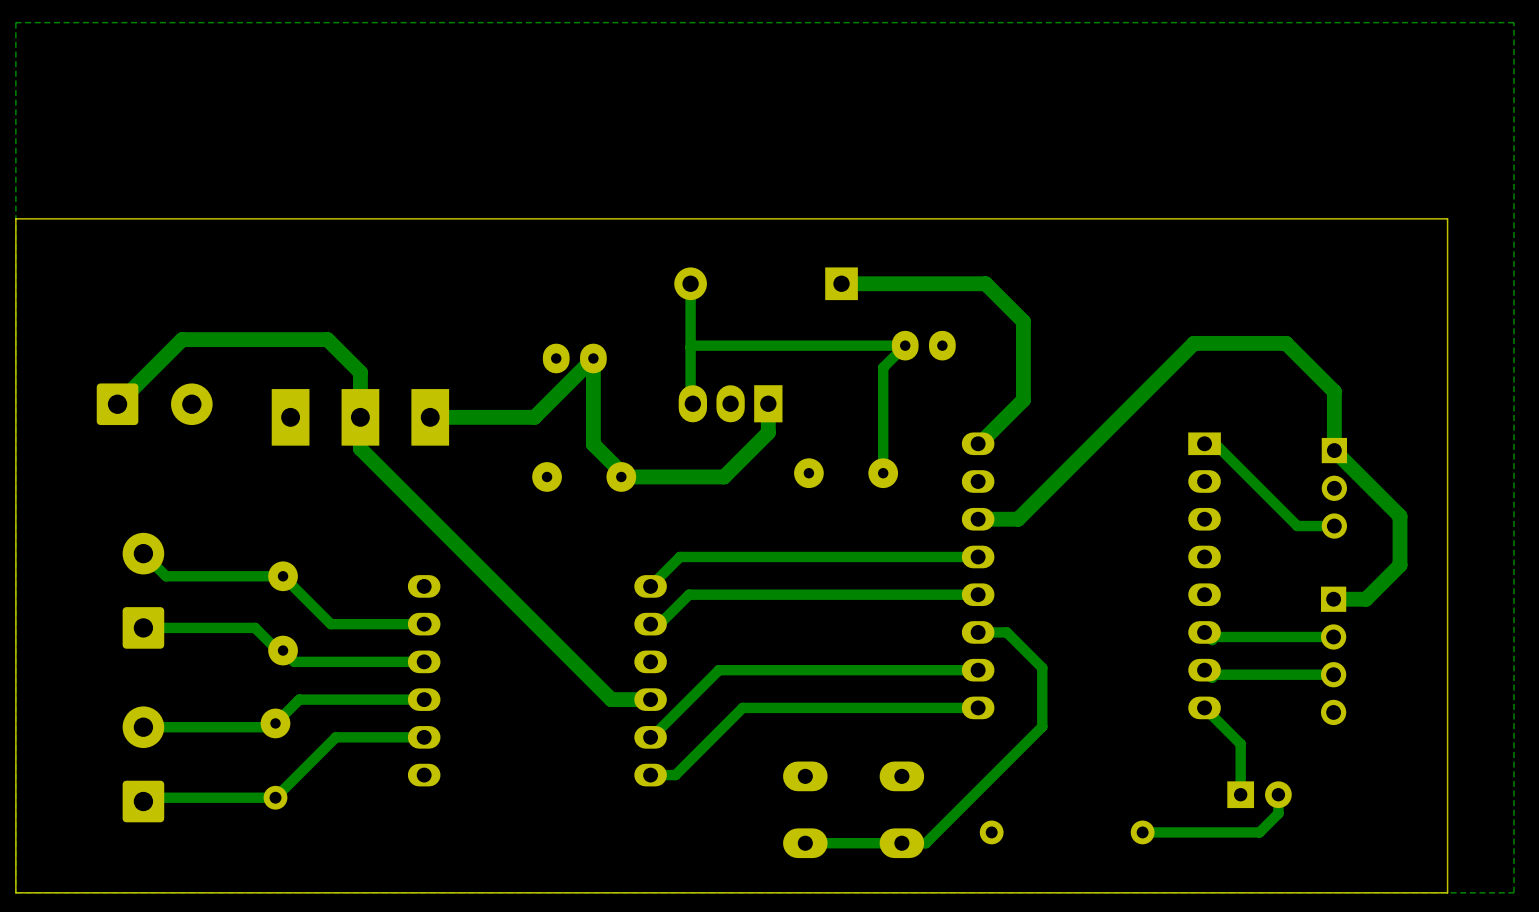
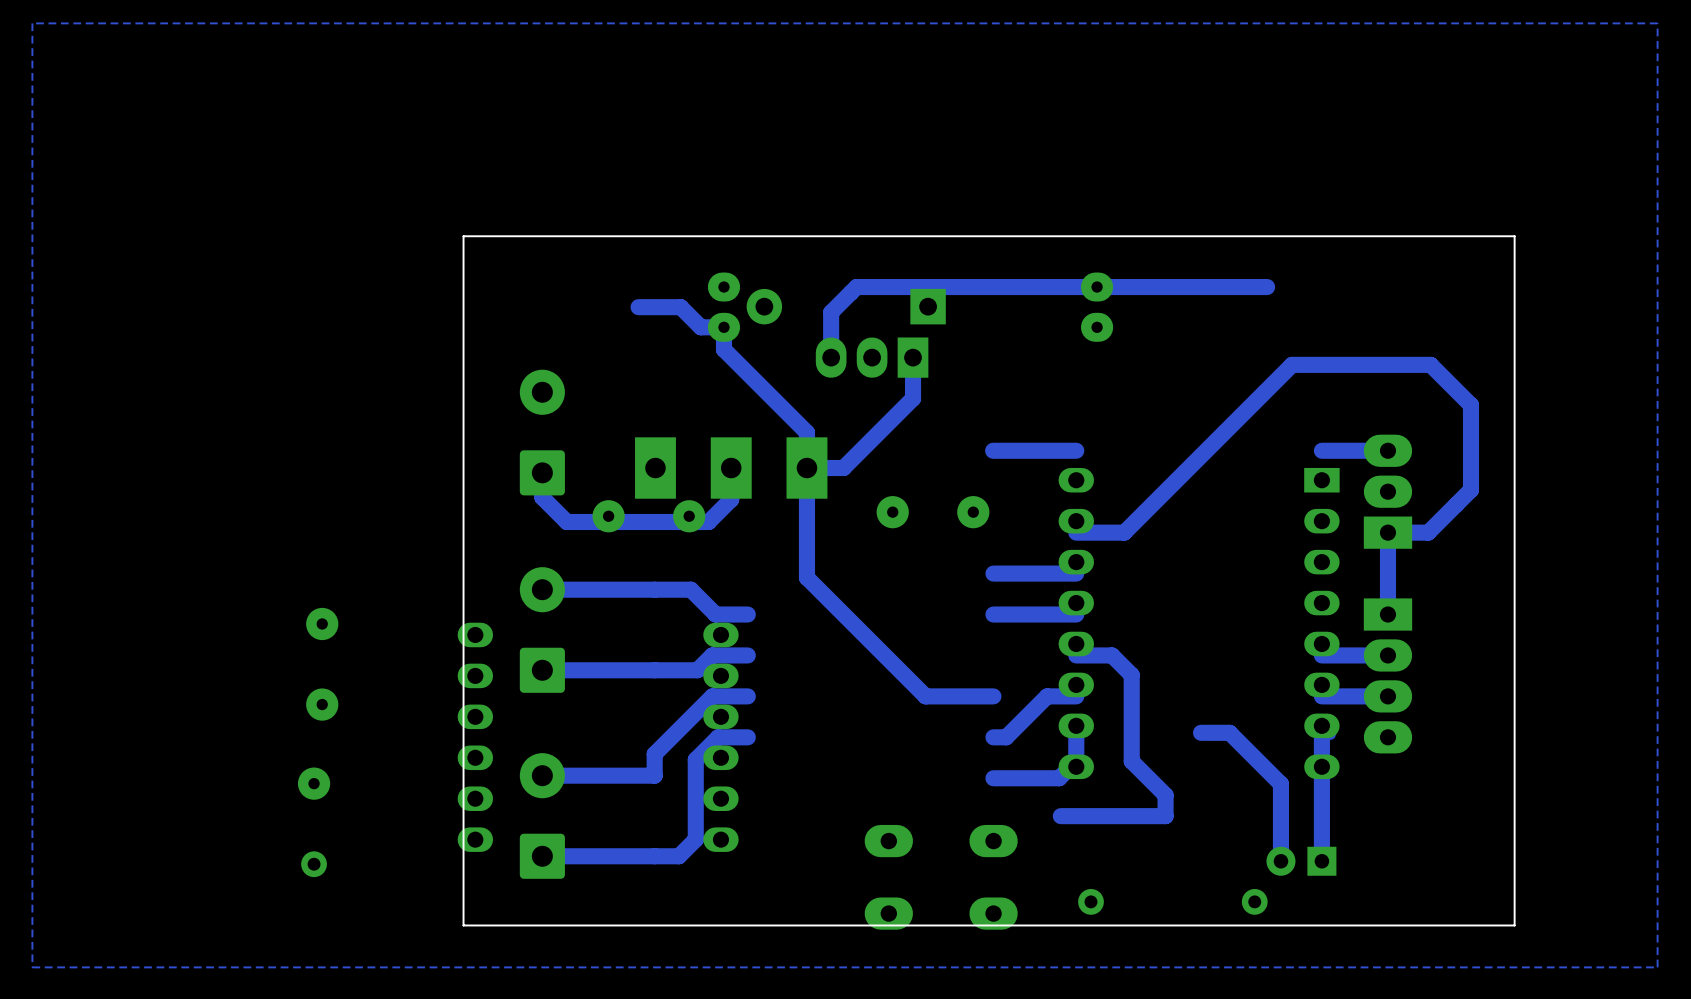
board edge: (1382, 218) (1447, 218) (1447, 892) (15, 892) (15, 218) (413, 218) -> (1514, 236) (1514, 925) (463, 925) (463, 236)
bottom track: none -> (1267, 287) (856, 287) (831, 312) (831, 357)
bottom track: (690, 283) (690, 401) (692, 403) -> none
bottom track: (841, 283) (985, 283) (1023, 321) (1023, 399) (978, 443) -> none
bottom track: none -> (638, 307) (680, 307) (700, 327) (723, 327) (723, 349) (806, 432) (806, 577) (925, 696) (993, 696)
bottom track: none -> (913, 357) (913, 398) (843, 468) (806, 468)
part rotation: 0° (923, 345) -> 90° clockwise (1097, 307)
part position: (923, 345) -> (1097, 307)
bottom track: (690, 347) (905, 345) (883, 367) (883, 473) -> none
part rotation: 0° (574, 358) -> 90° clockwise (723, 307)
part position: (574, 358) -> (723, 307)
part: none -> (542, 432)
part position: (730, 403) -> (872, 357)
bottom track: (768, 403) (768, 432) (724, 476) (621, 476) (621, 472) (593, 444) (593, 358) (534, 417) (430, 417) -> none
bottom track: (117, 404) (182, 339) (327, 339) (360, 372) (360, 448) (611, 699) (650, 699) -> none
part: (154, 404) -> none
bottom track: none -> (1076, 450) (993, 450)
bottom track: none -> (1387, 450) (1321, 450)
part position: (360, 417) -> (731, 468)
bottom track: none -> (731, 468) (731, 499) (708, 522) (566, 522) (542, 497) (542, 472)
bottom track: (1204, 443) (1215, 443) (1297, 526) (1334, 526) -> none
part: none -> (1387, 491)
part: (1334, 488) -> none
bottom track: none -> (1076, 532) (1124, 532) (1292, 364) (1430, 364) (1470, 405) (1470, 489) (1428, 532) (1387, 532) (1387, 614)
bottom track: (978, 519) (1018, 519) (1193, 343) (1286, 343) (1334, 391) (1334, 450) (1400, 516) (1400, 565) (1366, 599) (1333, 599) -> none
bottom track: none -> (1076, 573) (993, 573)
bottom track: none -> (542, 589) (690, 589) (715, 614) (747, 614)
bottom track: (143, 553) (166, 576) (283, 576) (330, 624) (424, 624) -> none
bottom track: (978, 556) (680, 556) (650, 586) -> none
bottom track: none -> (1076, 614) (993, 614)
part: none -> (542, 629)
part: (143, 590) -> none
bottom track: (978, 594) (689, 594) (659, 624) (650, 624) -> none
bottom track: none -> (747, 655) (712, 655) (697, 670) (542, 670)
bottom track: none -> (1076, 655) (1112, 655) (1131, 675) (1131, 761) (1165, 795) (1165, 816) (1060, 816)
bottom track: none -> (1387, 655) (1321, 655)
part: none -> (1387, 675)
bottom track: (143, 627) (255, 627) (277, 650) (283, 650) (294, 661) (424, 661) -> none
bottom track: (973, 628) (978, 632) (1006, 632) (1042, 667) (1042, 726) (925, 843) (805, 843) -> none
bottom track: (1333, 636) (1209, 636) -> none
bottom track: none -> (747, 696) (712, 696) (654, 754) (654, 775) (542, 775)
bottom track: none -> (1076, 696) (1047, 696) (1006, 737) (993, 737)
bottom track: none -> (1387, 696) (1321, 696)
part: (1333, 655) -> none
bottom track: (978, 670) (718, 670) (650, 737) -> none
bottom track: (1333, 674) (1209, 674) -> none
bottom track: none -> (1201, 732) (1229, 732) (1280, 784) (1280, 861)
bottom track: none -> (747, 737) (718, 737) (695, 759) (695, 839) (679, 856) (542, 856)
bottom track: none -> (1076, 737) (1076, 761) (1059, 778) (993, 778)
bottom track: none -> (1321, 737) (1321, 861)
bottom track: (424, 699) (299, 699) (275, 723) (269, 723) (266, 727) (143, 727) (147, 723) -> none
bottom track: (978, 707) (742, 707) (675, 775) (650, 775) -> none
bottom track: (1196, 707) (1204, 707) (1240, 744) (1240, 794) -> none
bottom track: (424, 737) (335, 737) (271, 801) -> none
part: none -> (542, 815)
part: (143, 764) -> none
part rotation: 0° (1259, 794) -> 180° (1301, 861)
part position: (1259, 794) -> (1301, 861)
bottom track: (1278, 794) (1278, 813) (1259, 832) (1142, 832) -> none
bottom track: (275, 797) (147, 797) (143, 801) -> none

